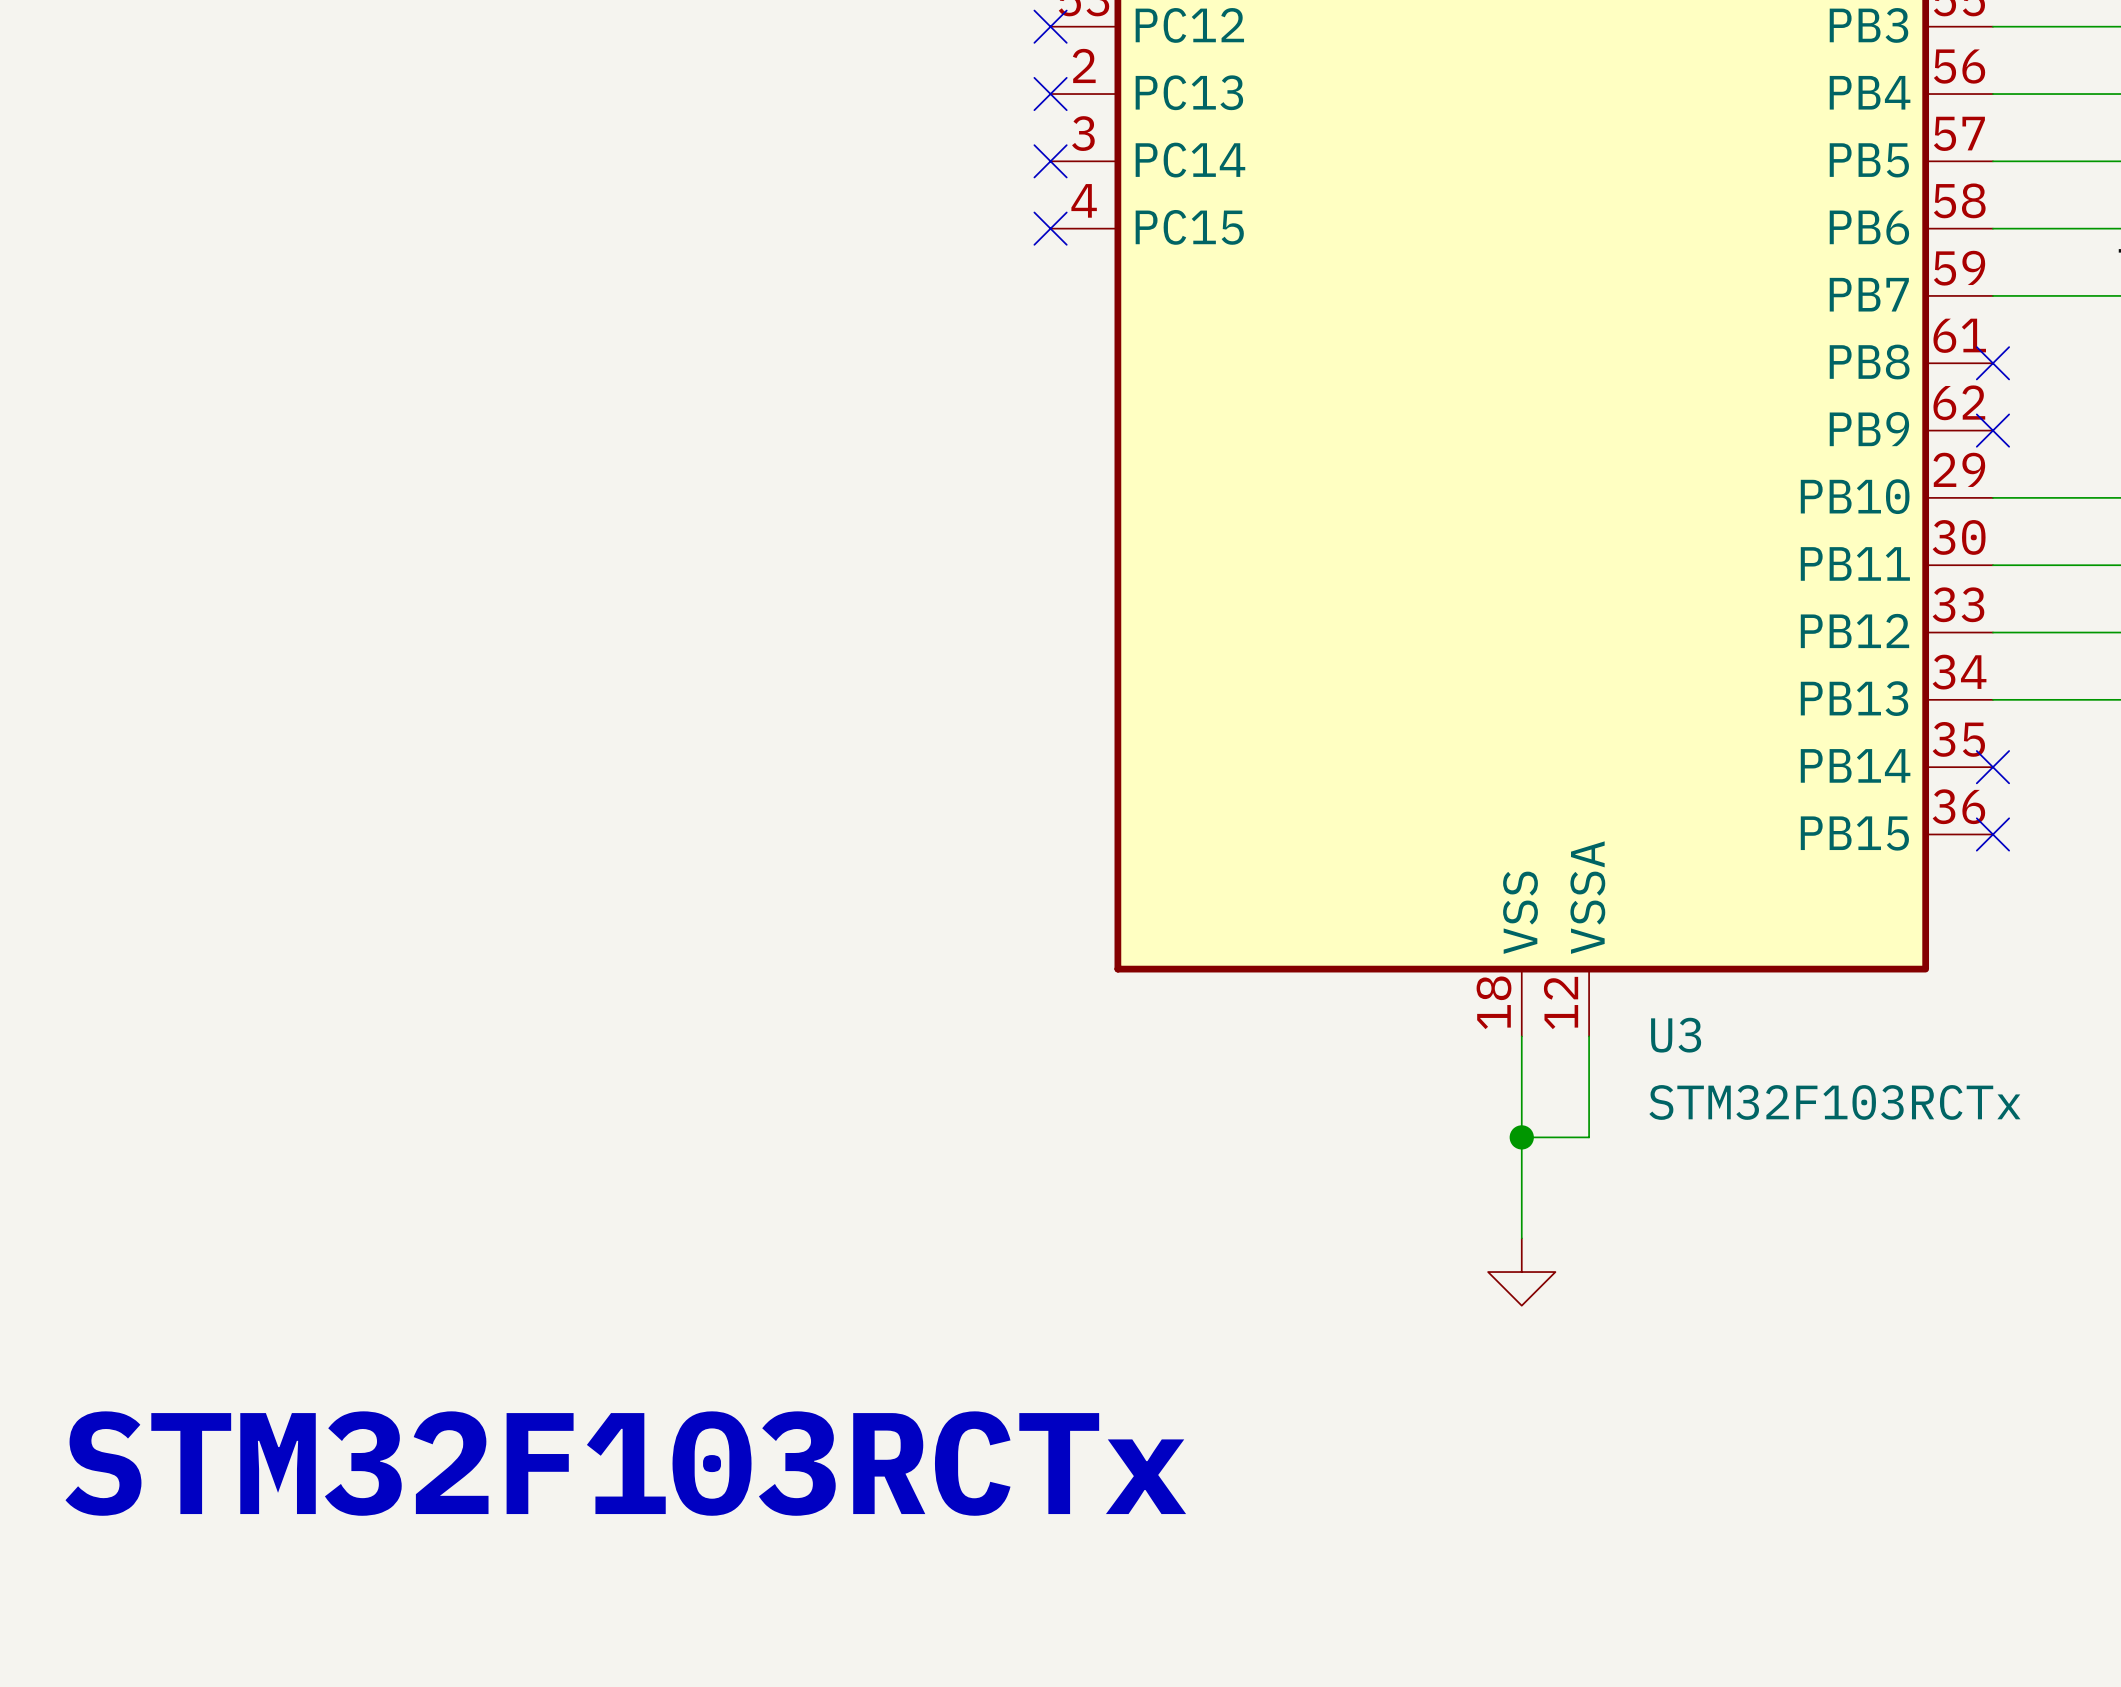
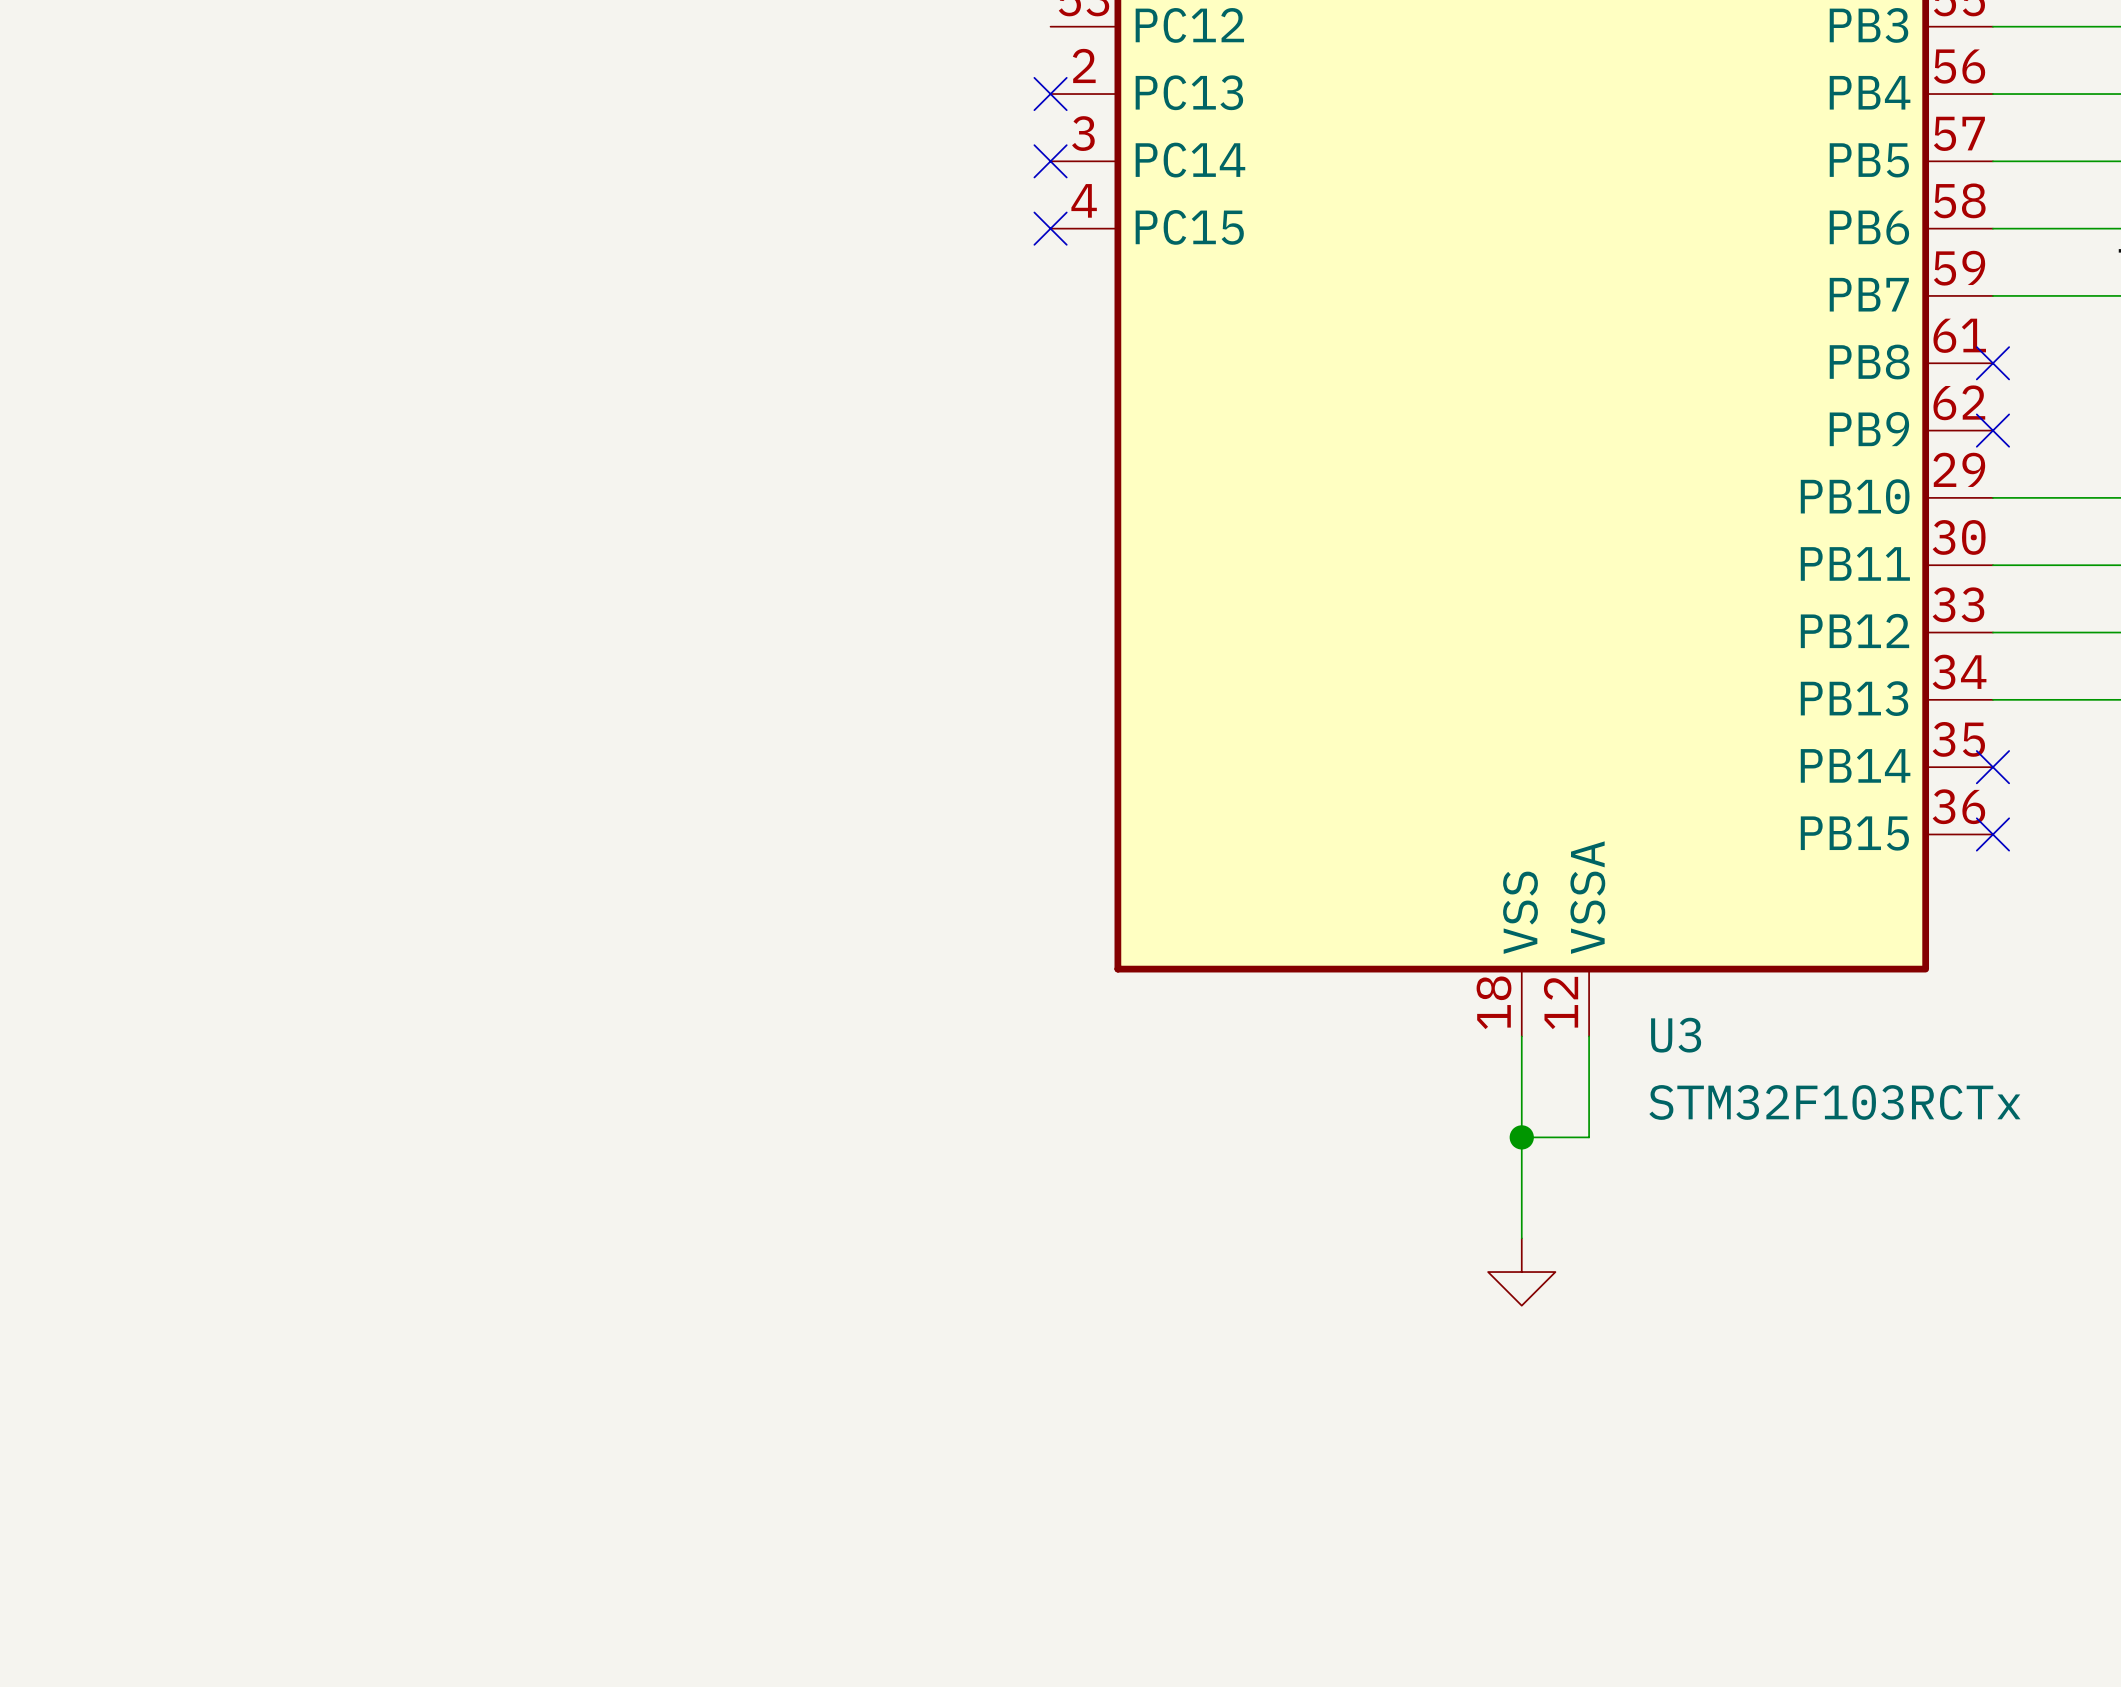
no-connect mark: (1050, 26) -> none
text: STM32F103RCTx (625, 1463) -> none

